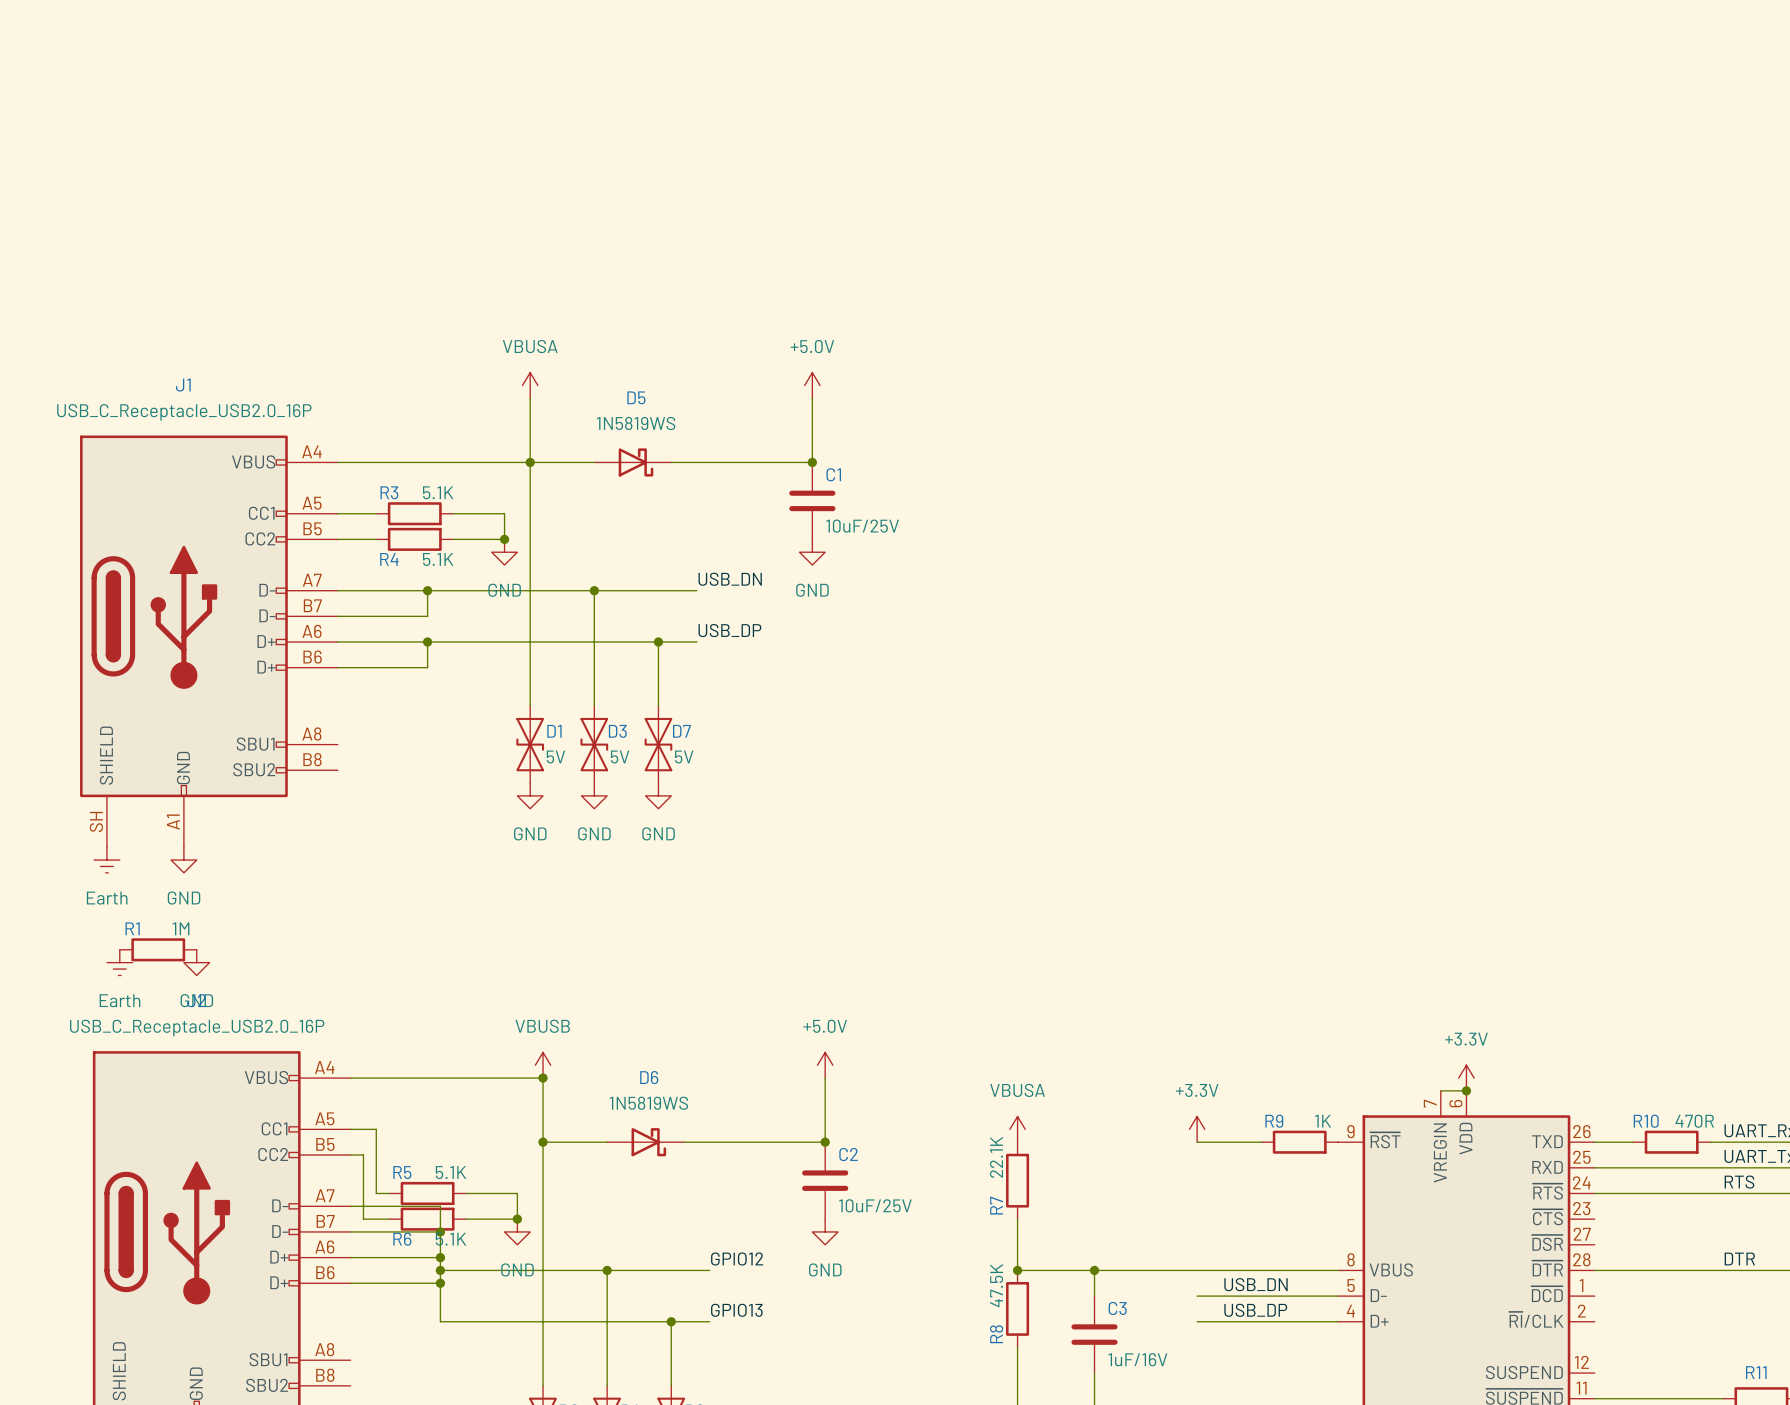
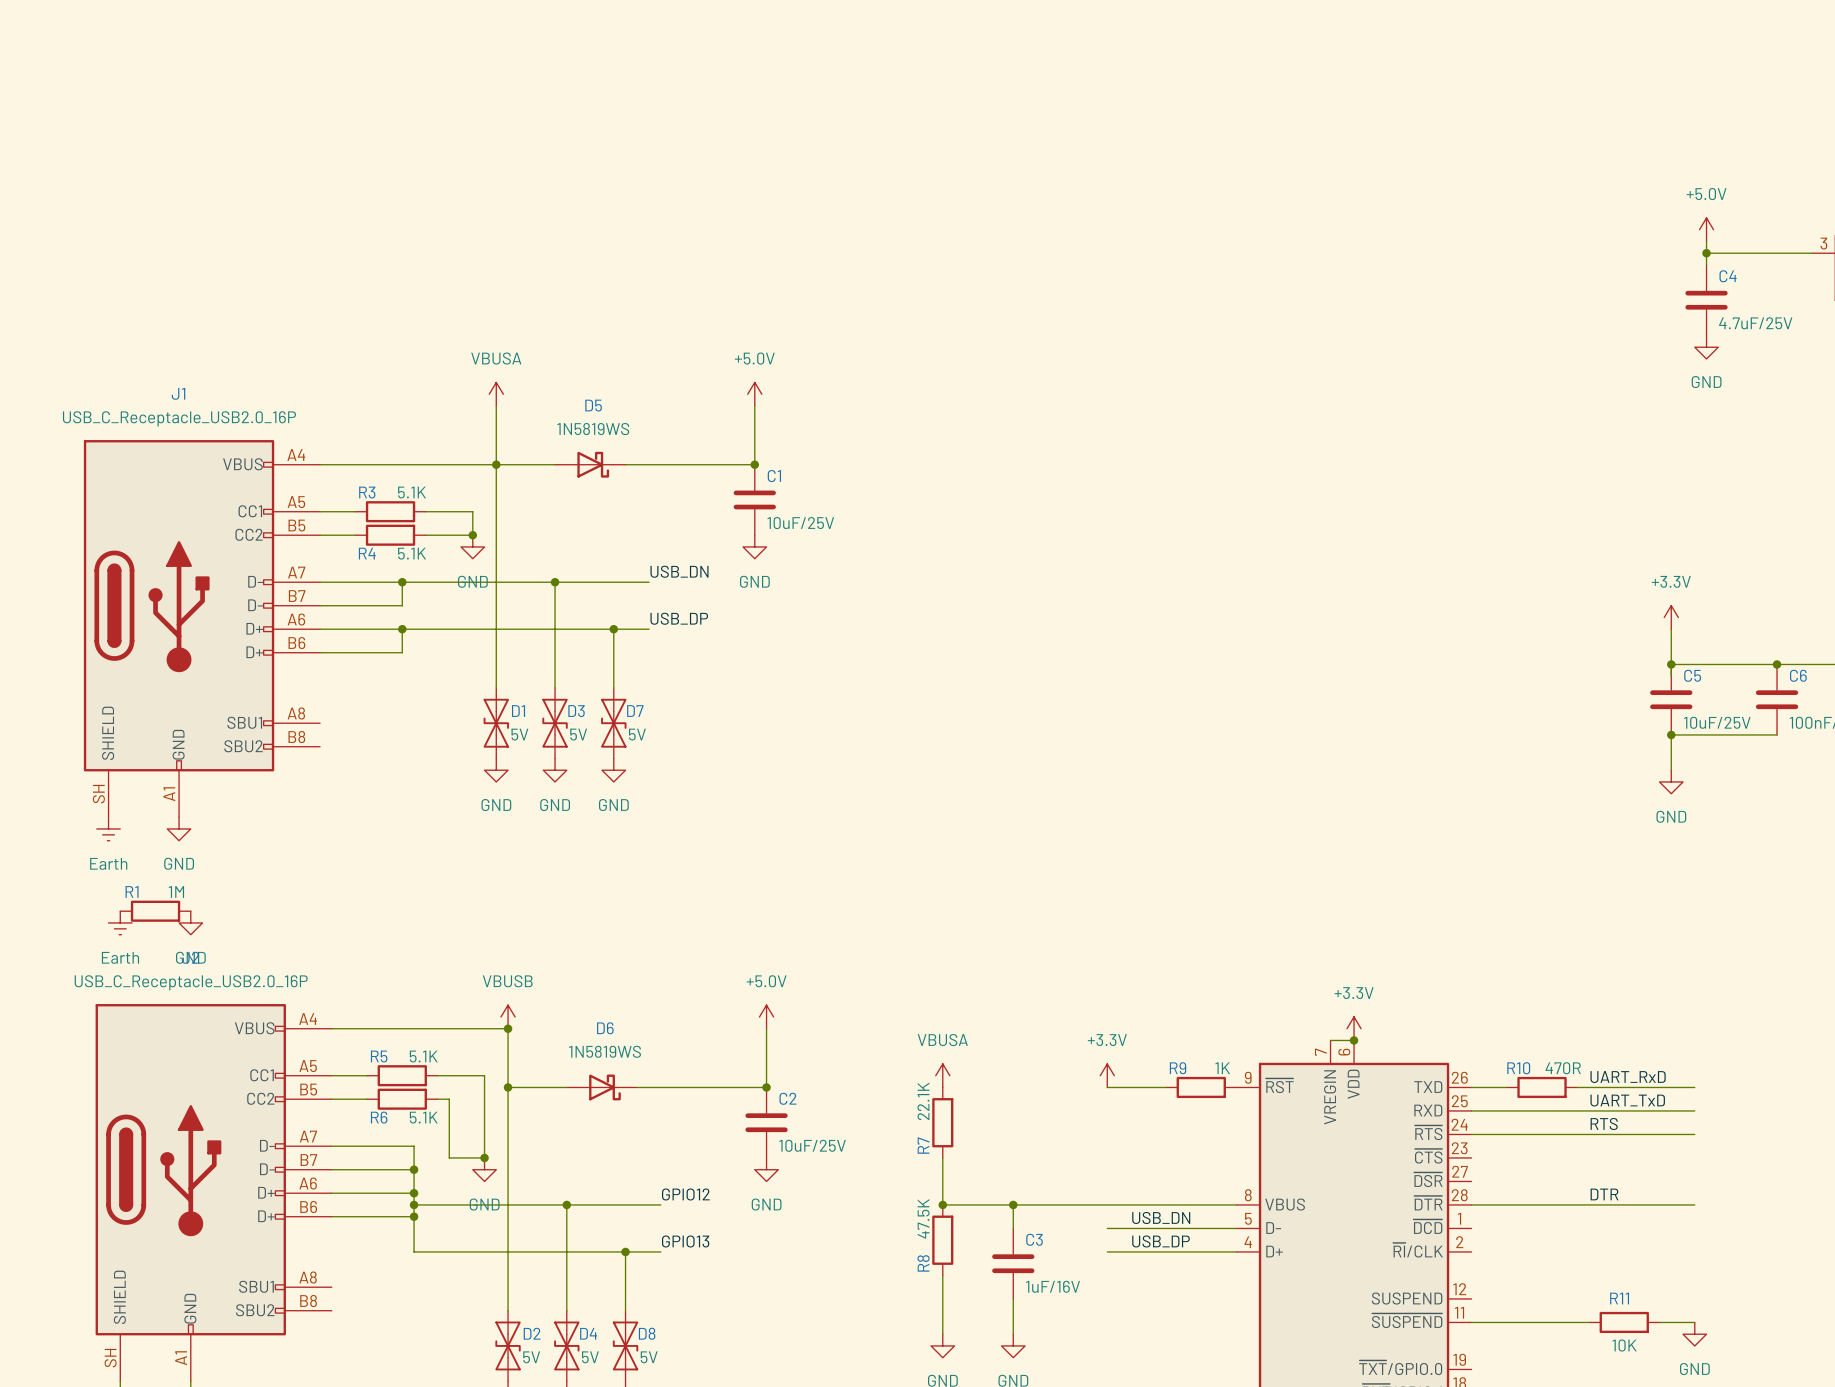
wire: (376, 1129) (376, 1193) (389, 1193) -> (355, 1075) (367, 1075)
wire: (363, 1155) (363, 1219) (389, 1219) -> (343, 1099) (367, 1099)
R5 position: (427, 1193) -> (402, 1075)
wire: (466, 1193) (517, 1193) -> (437, 1075) (484, 1075) (484, 1134)
R6 position: (427, 1219) -> (402, 1099)
wire: (466, 1219) (478, 1219) -> (437, 1099) (449, 1099) (449, 1157)

